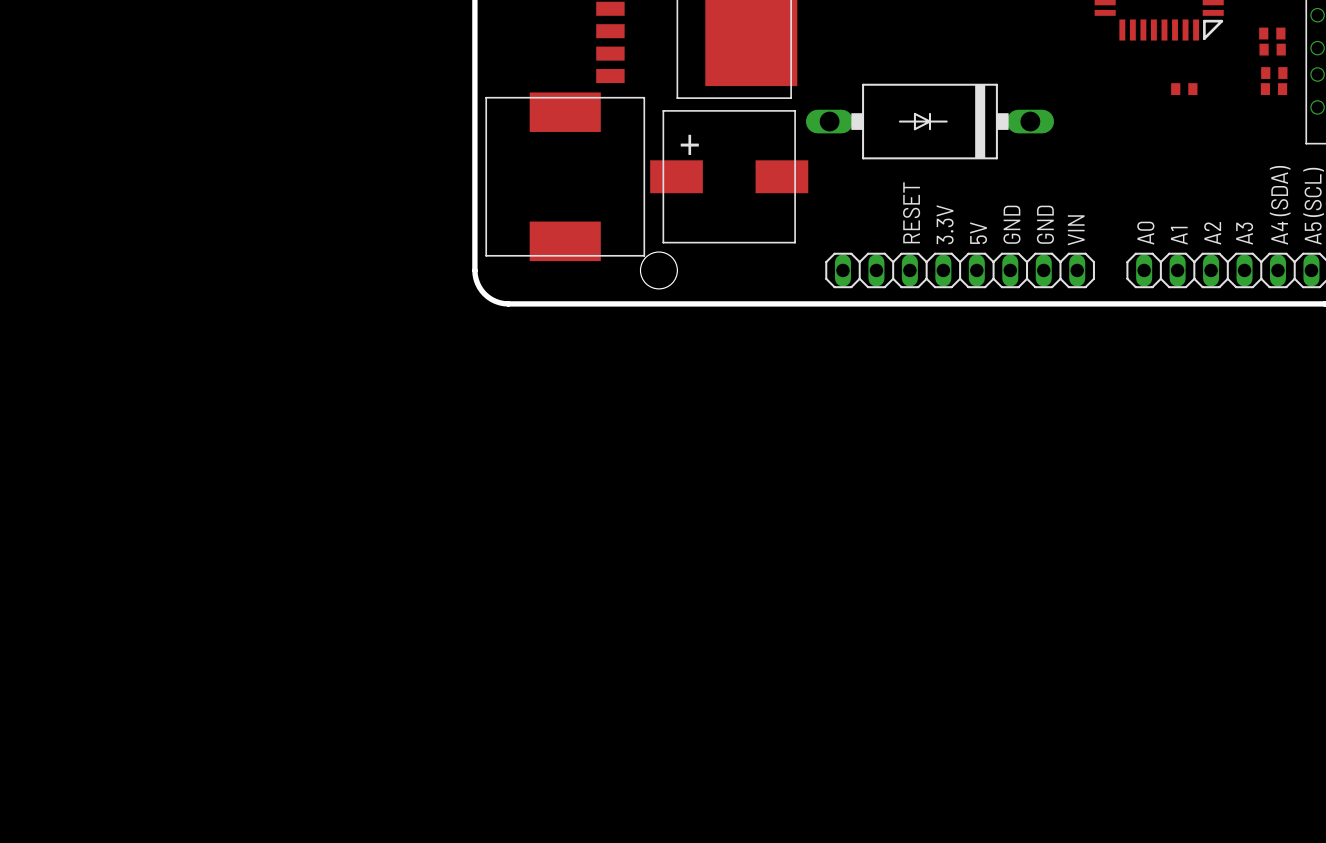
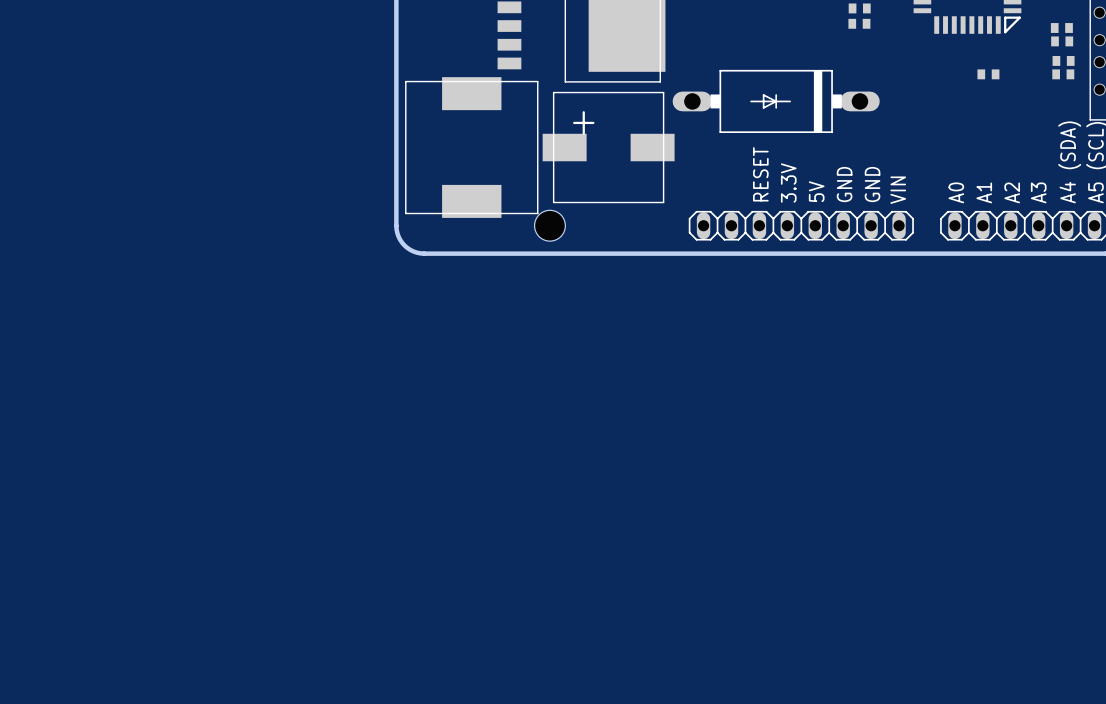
part: none -> (859, 8)
part: none -> (859, 23)

